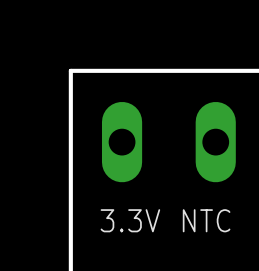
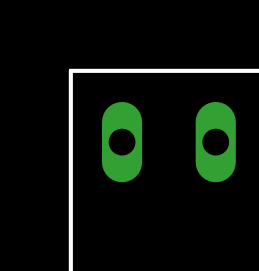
text: 3.3V (130, 220) -> none
text: NTC (206, 220) -> none

